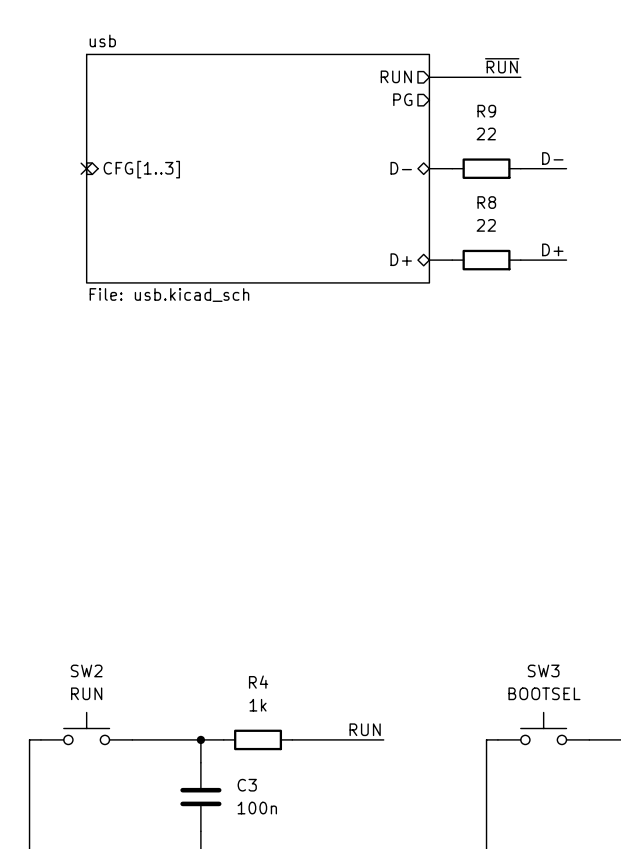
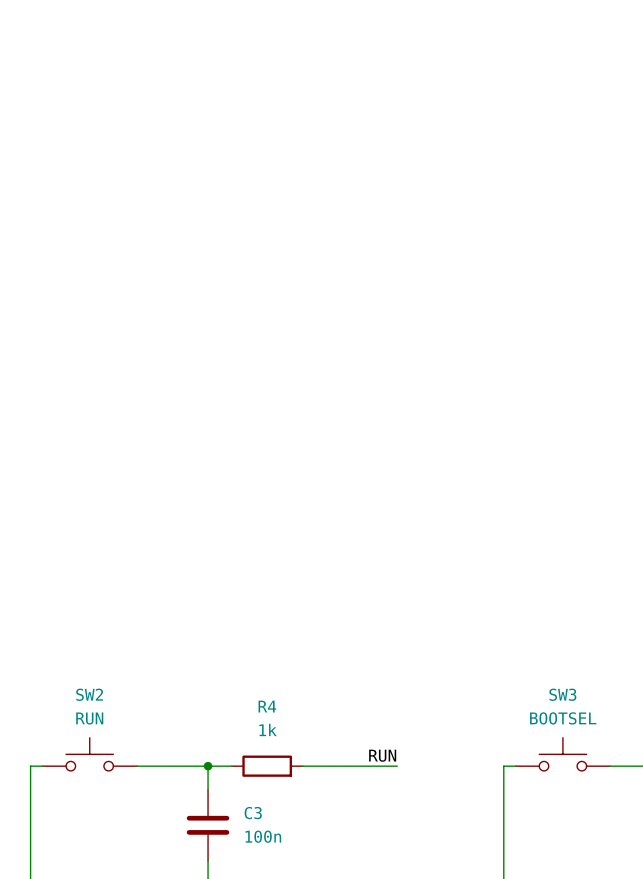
label: ~{RUN} (502, 65) -> none
sheet pin: RUN (396, 76) -> none
wire: (429, 77) (520, 77) -> none
sheet pin: PG (402, 99) -> none
label: D- (552, 158) -> none
no-connect mark: (86, 168) -> none
sheet usb: File: usb.kicad_sch (258, 168) -> none
sheet pin: D- (401, 168) -> none
wire: (429, 168) (452, 168) -> none
R9: 22 (486, 168) -> none
wire: (520, 168) (566, 168) -> none
sheet pin: CFG[1..3] (141, 169) -> none
label: D+ (552, 249) -> none
sheet pin: D+ (401, 259) -> none
wire: (429, 260) (452, 260) -> none
R8: 22 (486, 260) -> none
wire: (520, 260) (566, 260) -> none

